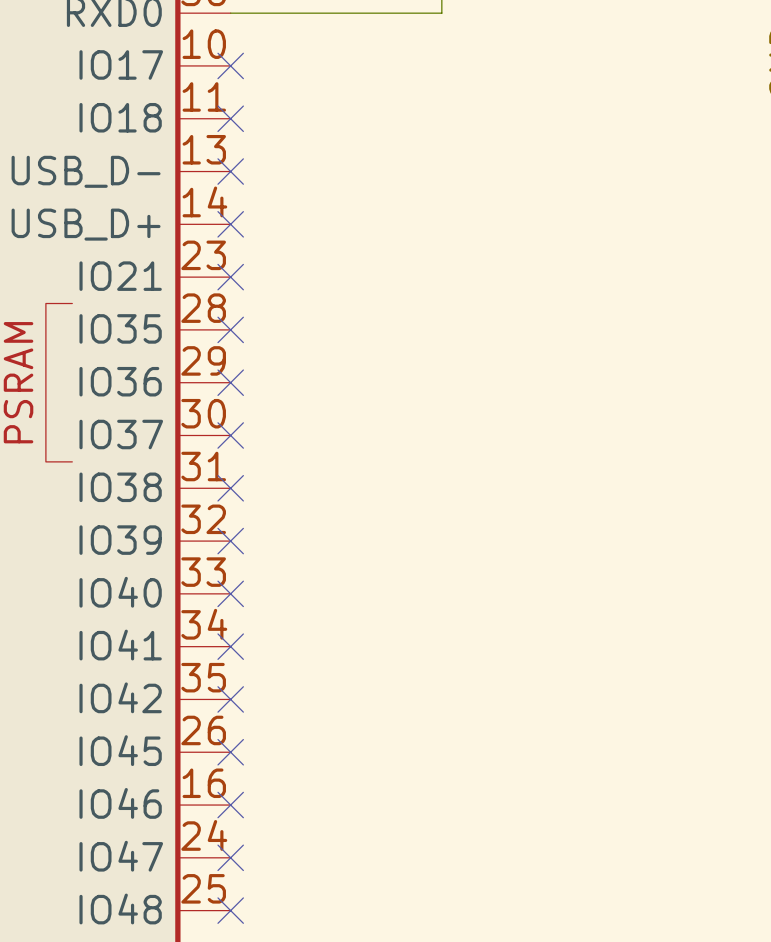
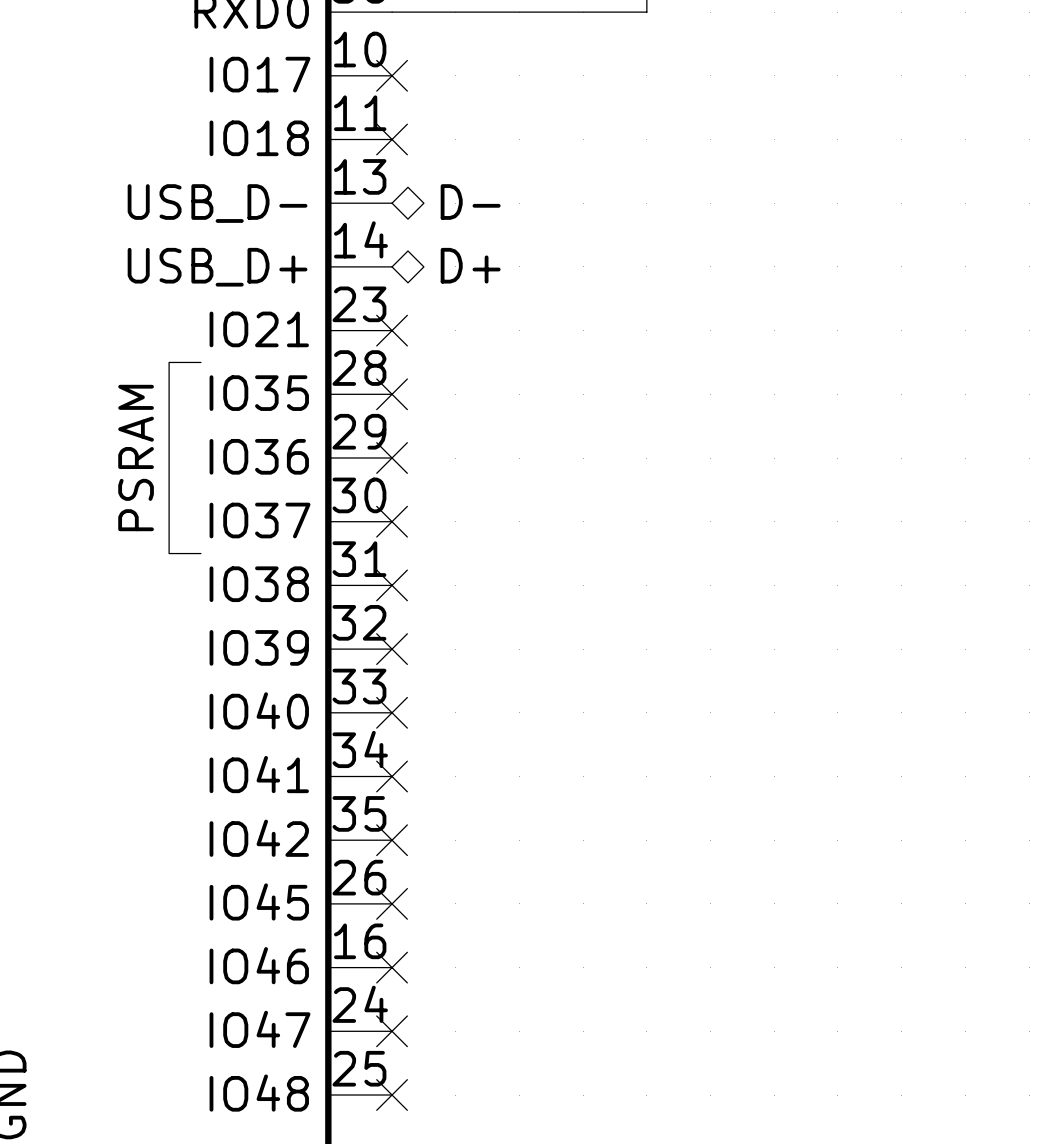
hierarchical label: none -> D- (470, 202)
no-connect mark: (230, 171) -> none
hierarchical label: none -> D+ (470, 265)
no-connect mark: (230, 224) -> none

